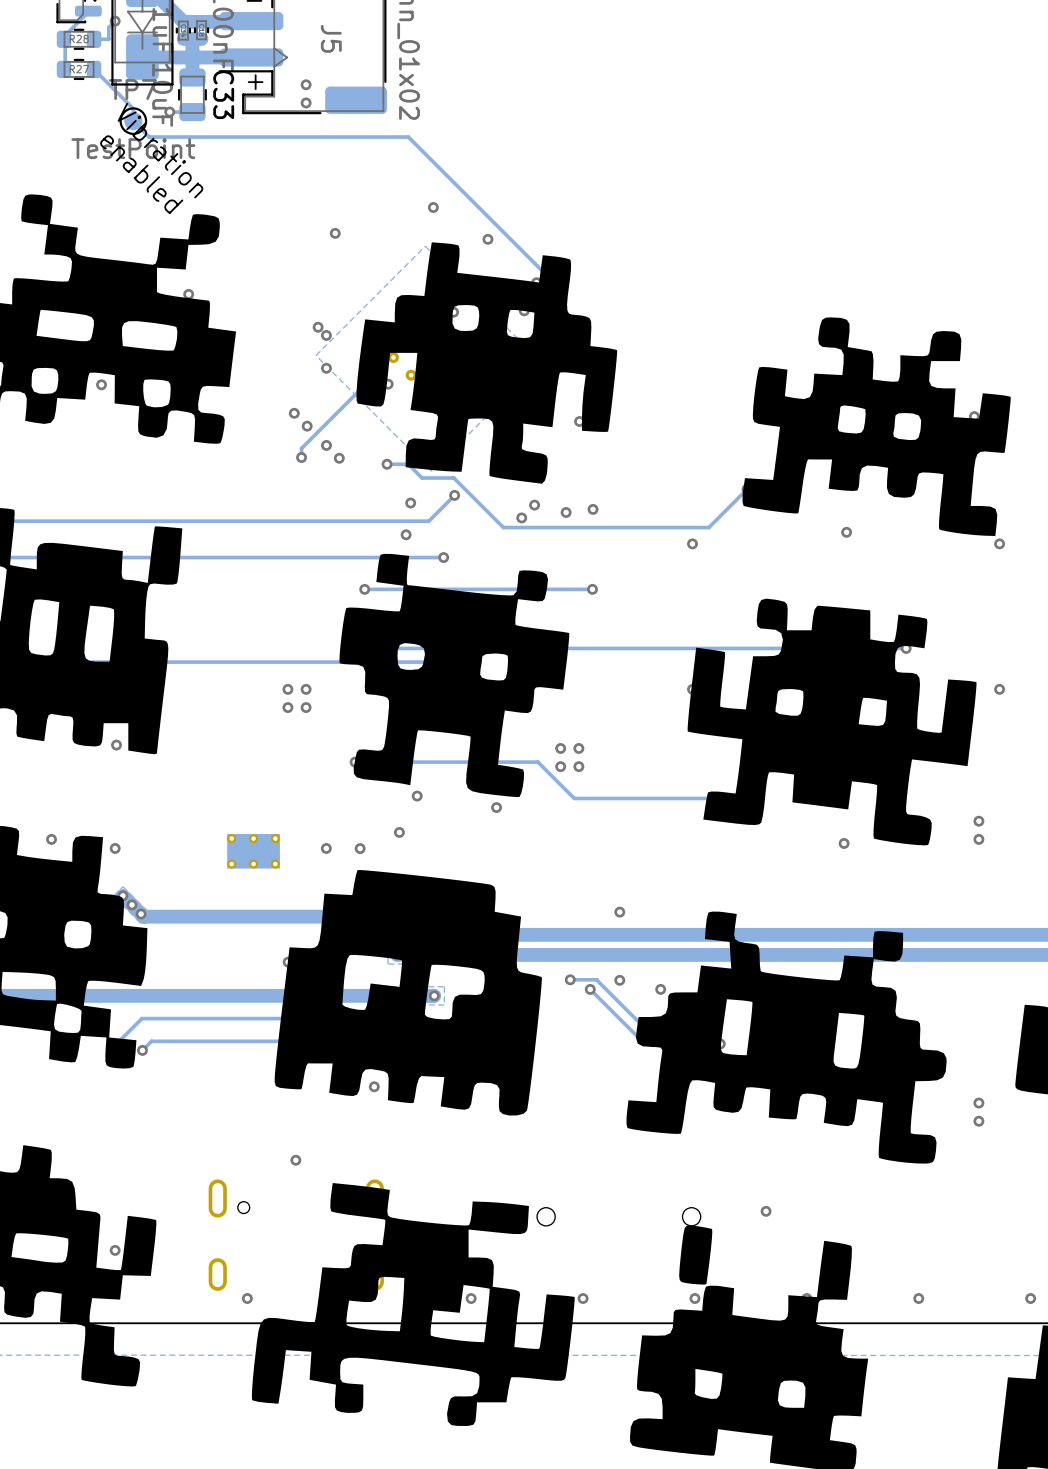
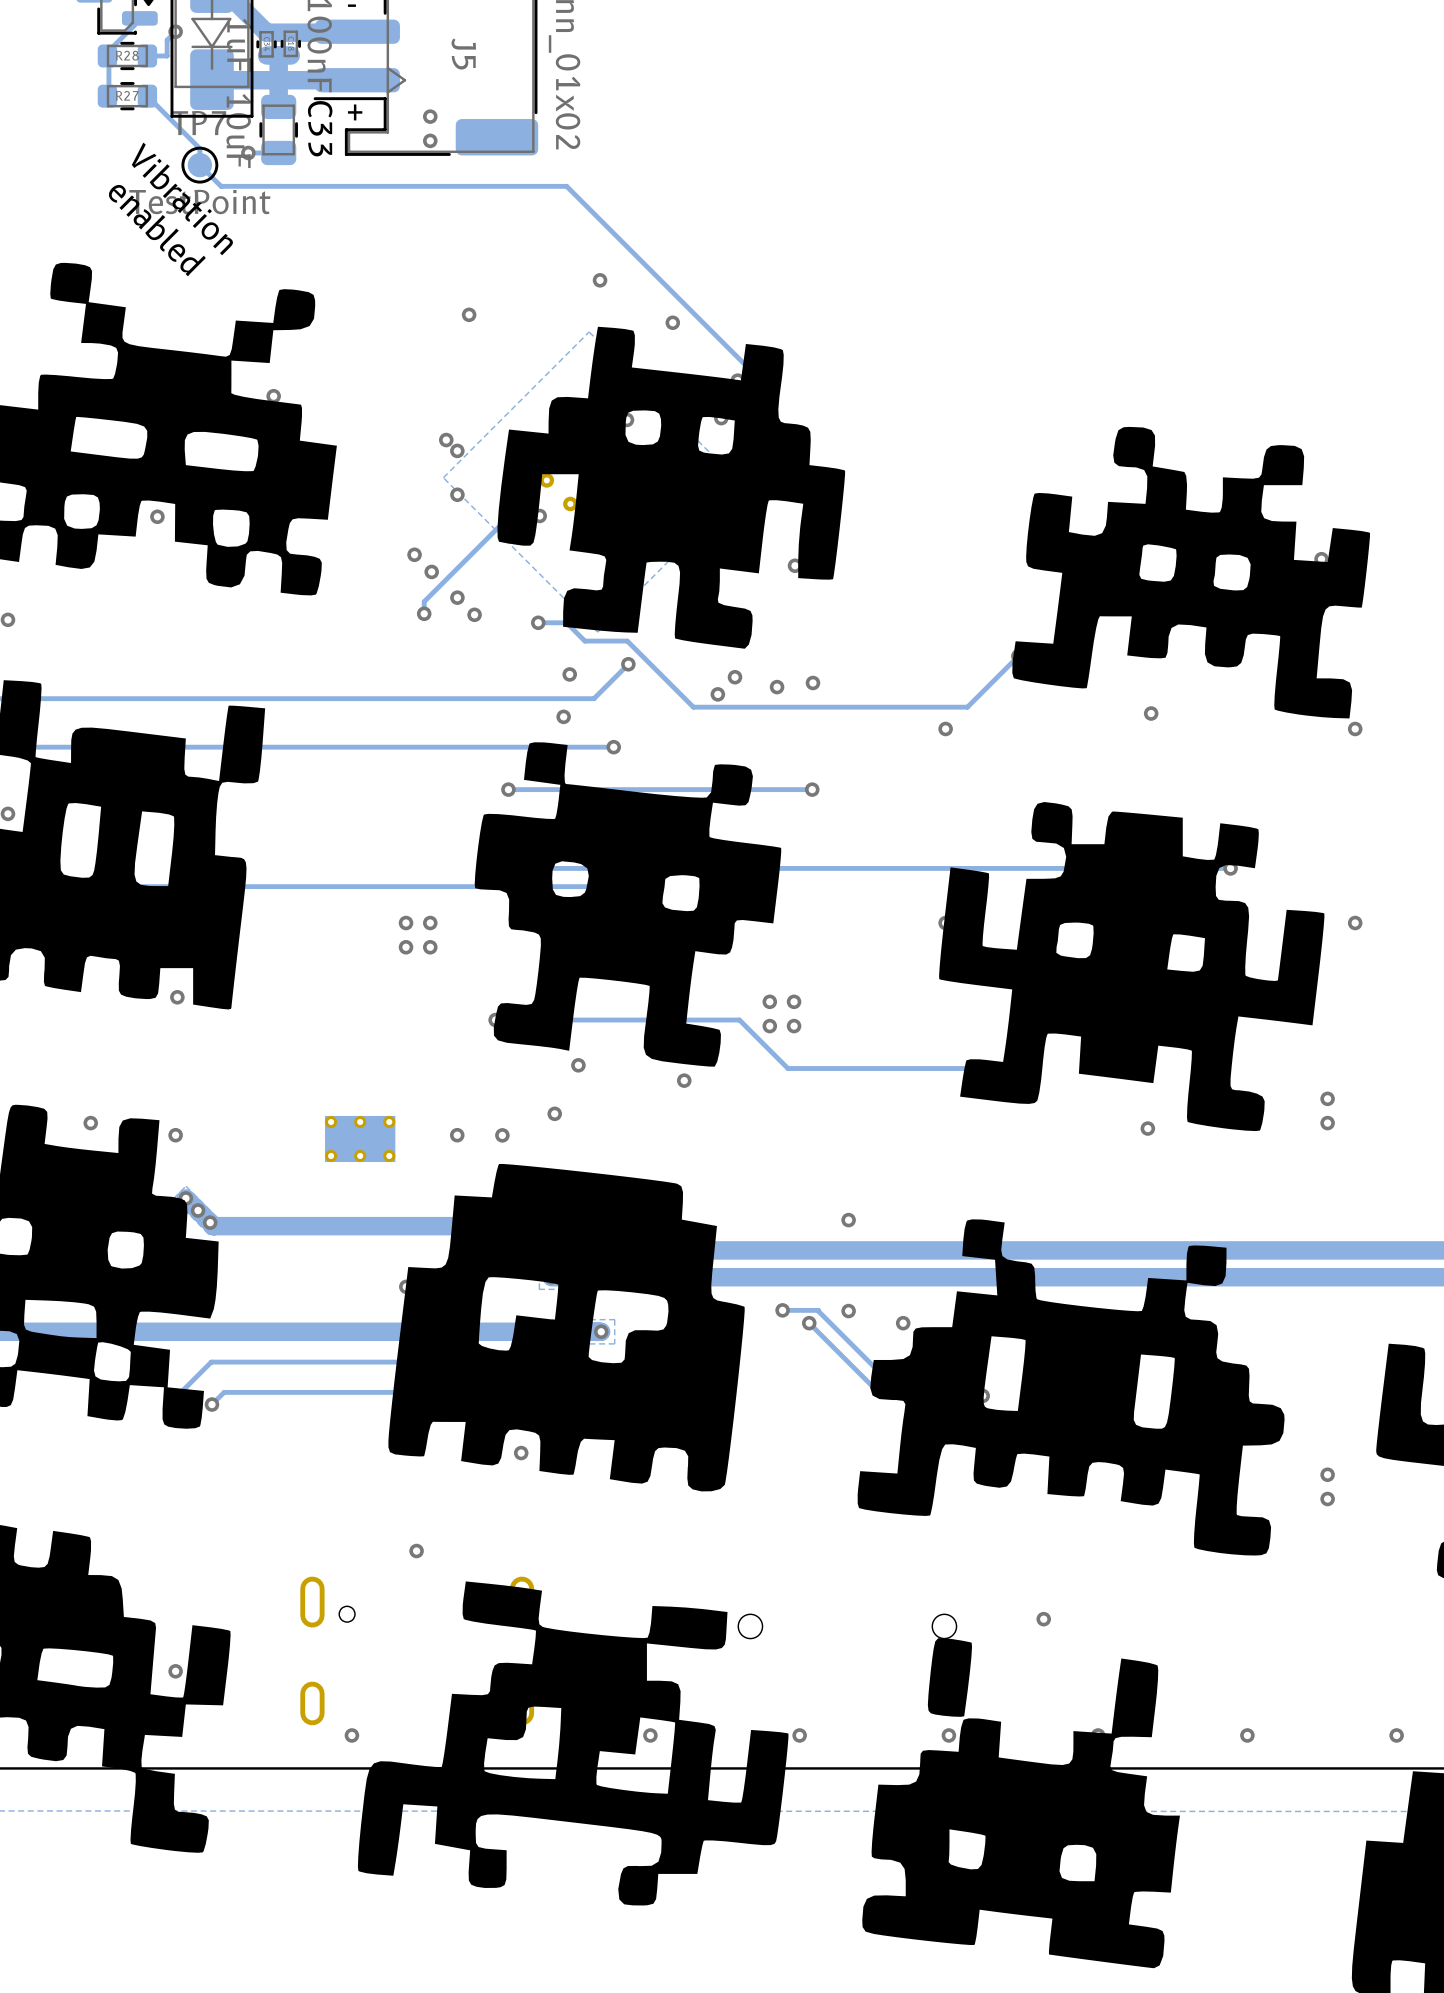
text position: Vibration (160, 150) -> Vibration (182, 198)
text position: enabled (141, 174) -> enabled (157, 230)

